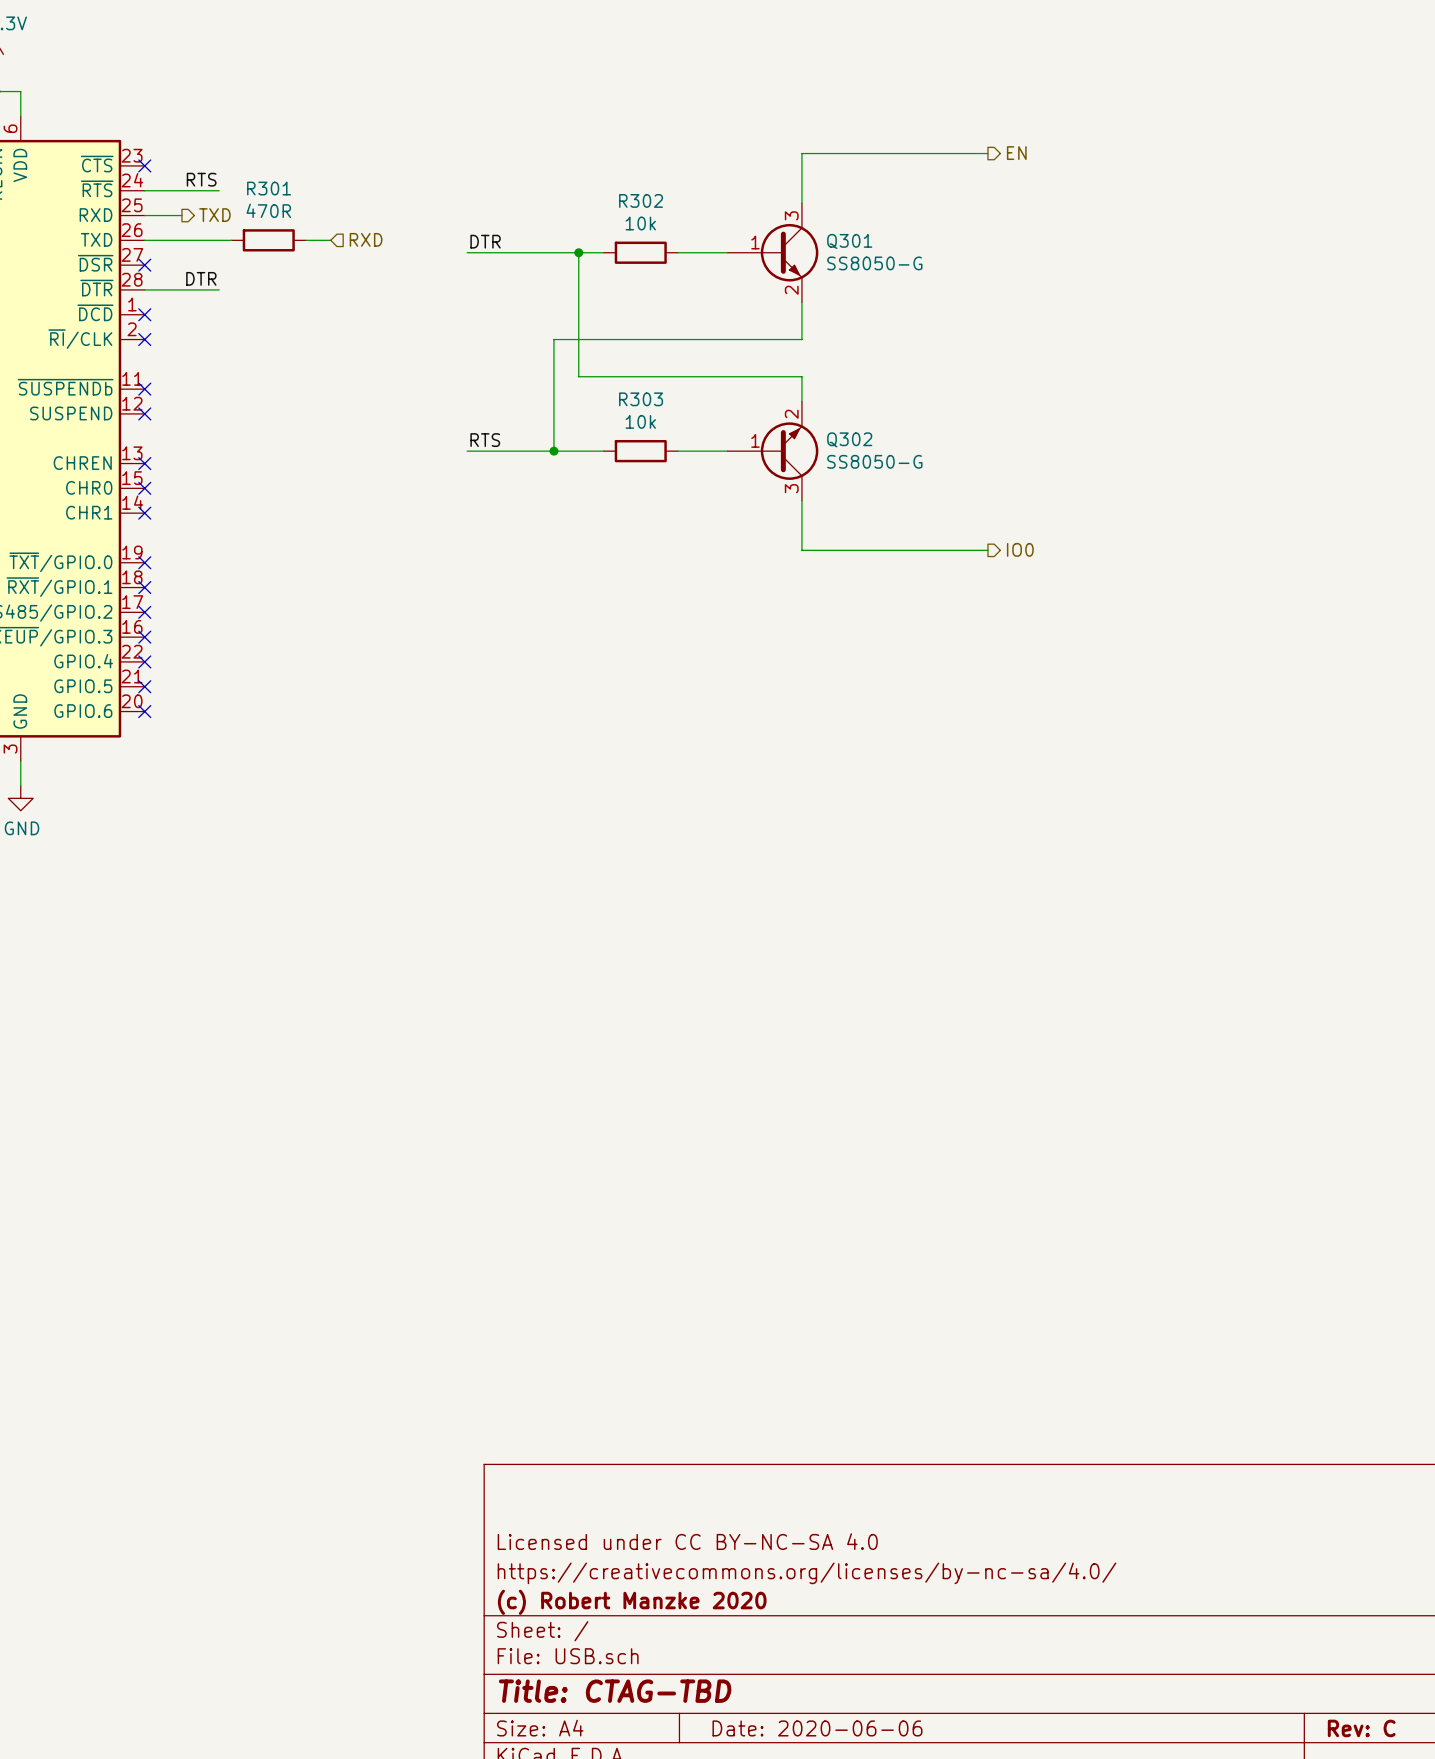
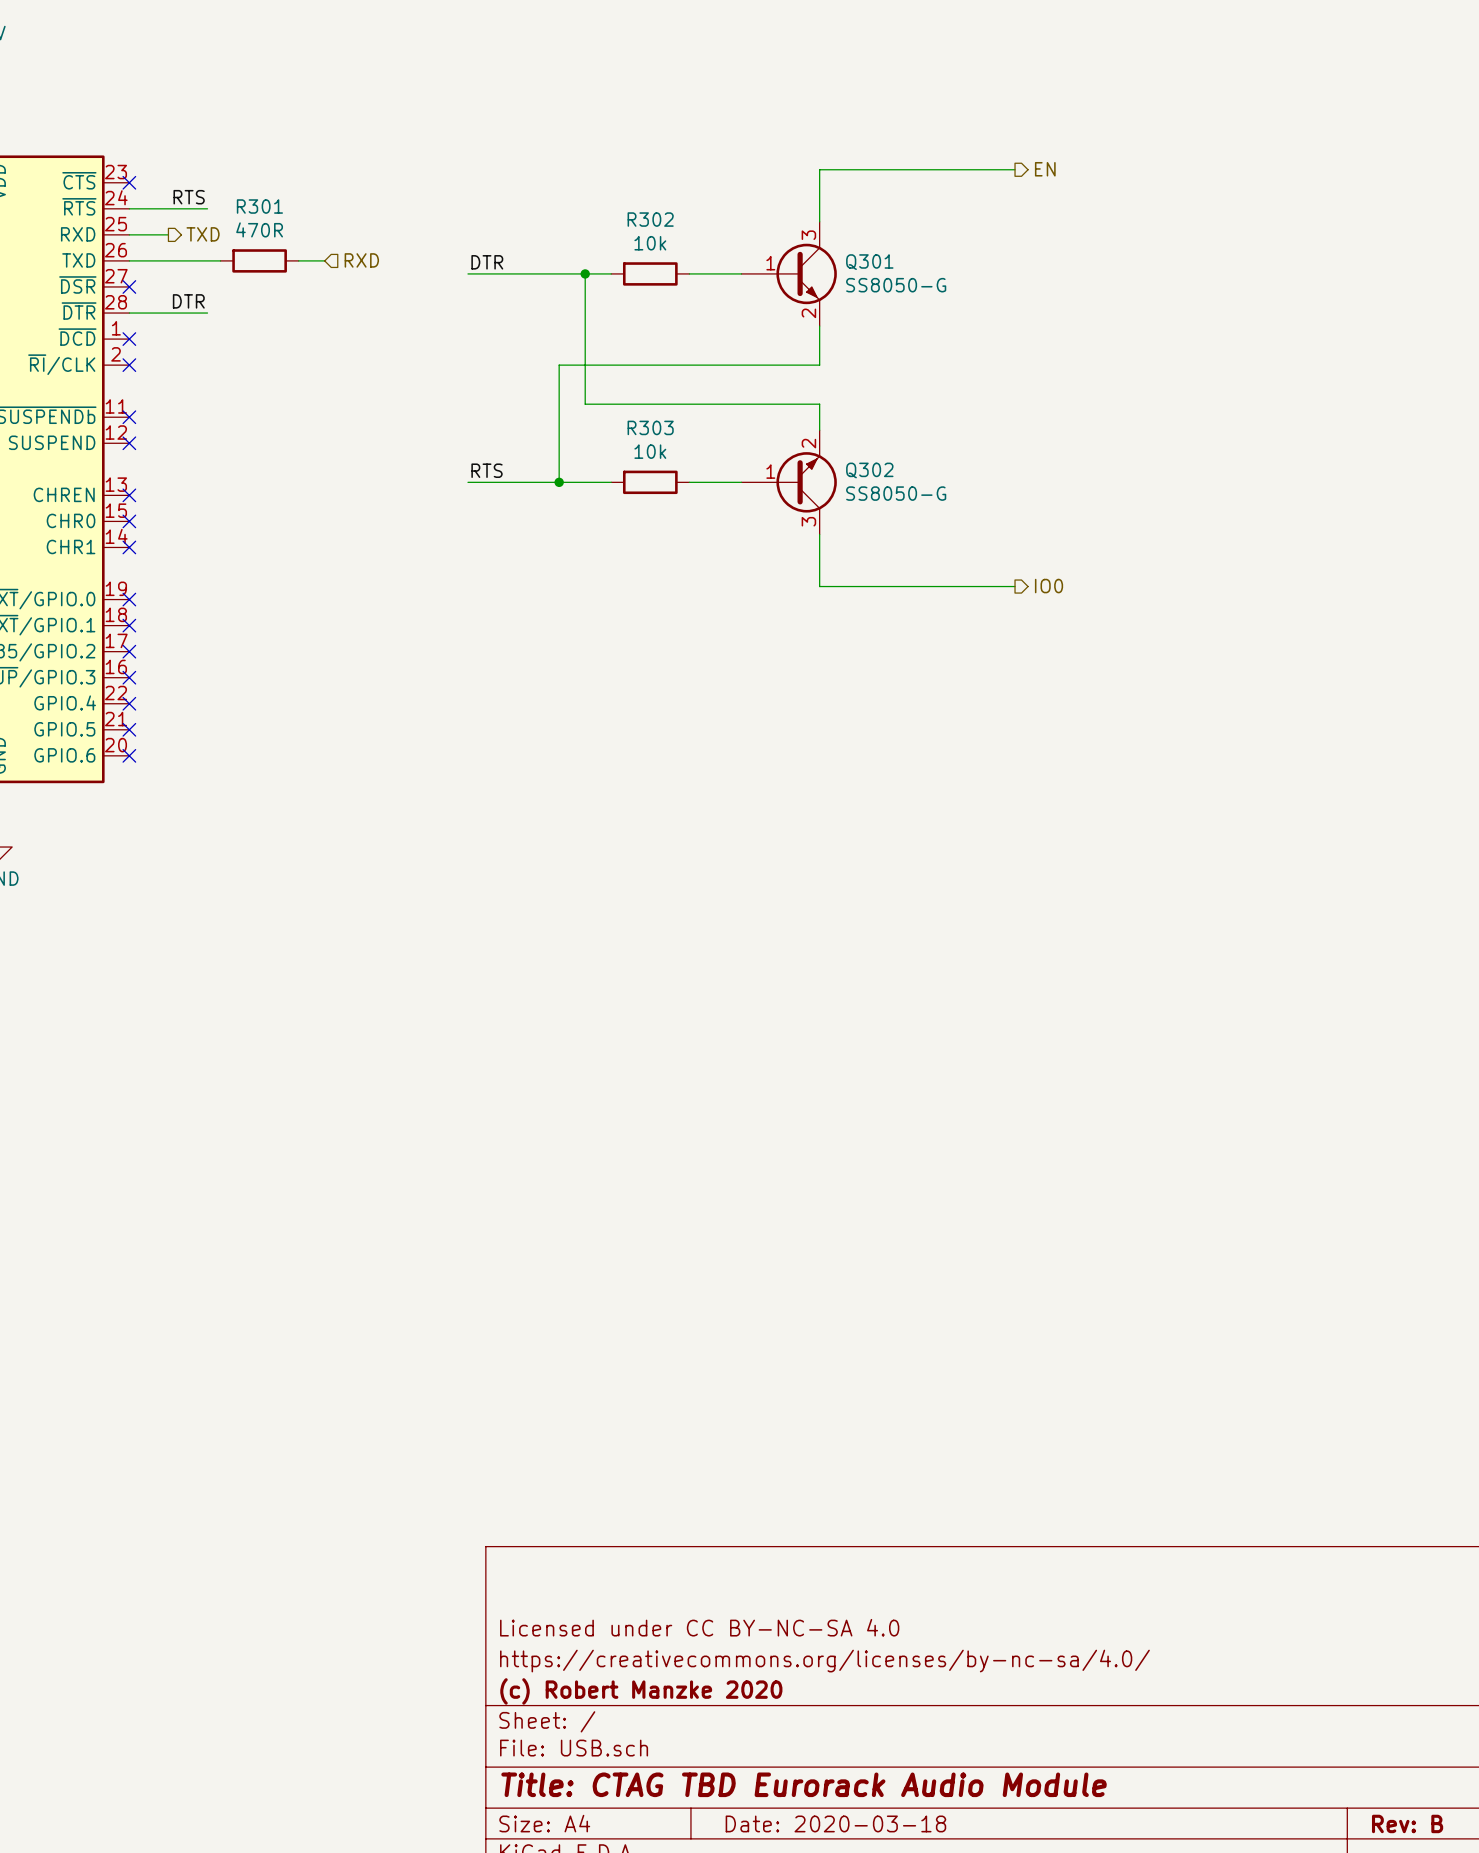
title block: Title: CTAG-TBD (615, 1691) -> Title: CTAG TBD Eurorack Audio Module (804, 1784)
title block: Date: 2020-06-06 (817, 1728) -> Date: 2020-03-18 (835, 1823)
title block: Rev: C (1361, 1728) -> Rev: B (1407, 1823)

